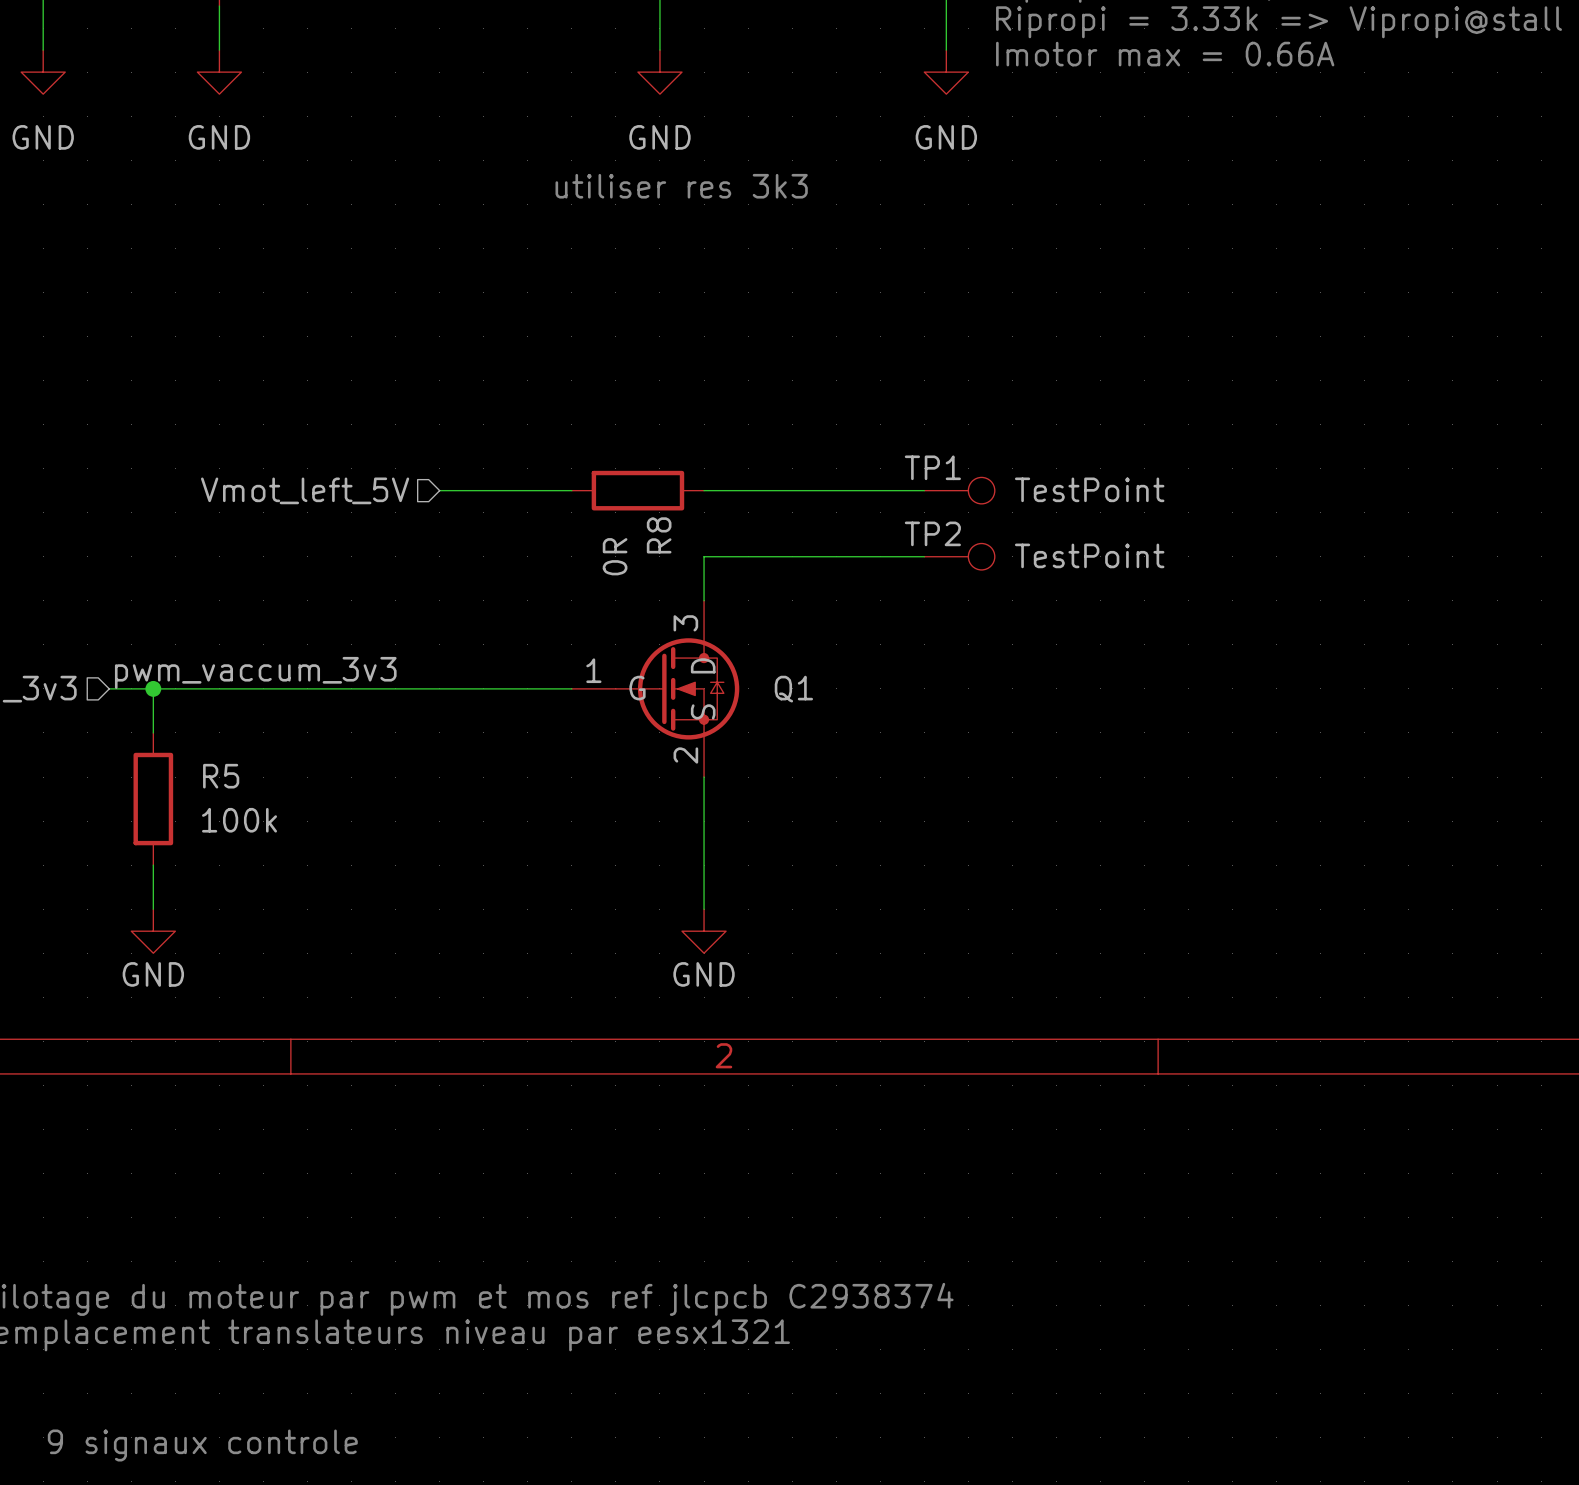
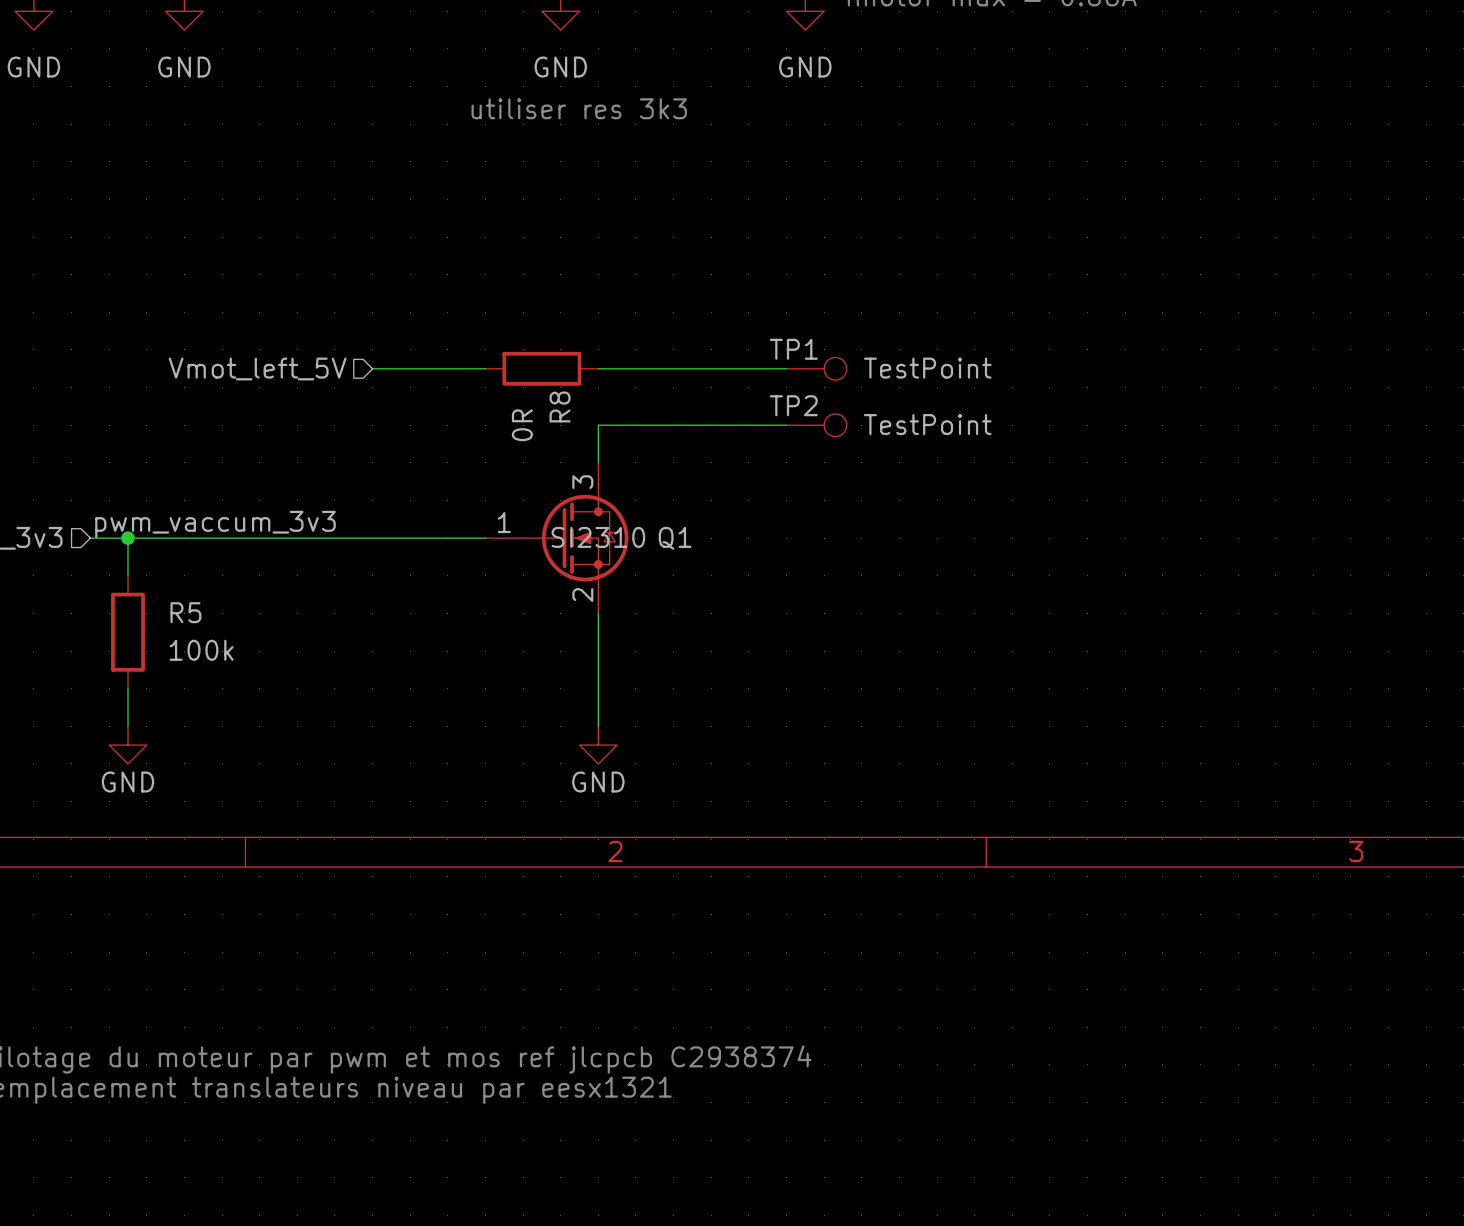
Q1 pin name: D (703, 665) -> none
Q1 pin name: G (637, 688) -> none
Q1 value: none -> SI2310 (598, 537)
Q1 pin name: S (703, 711) -> none
text: 9 signaux controle (202, 1445) -> none

